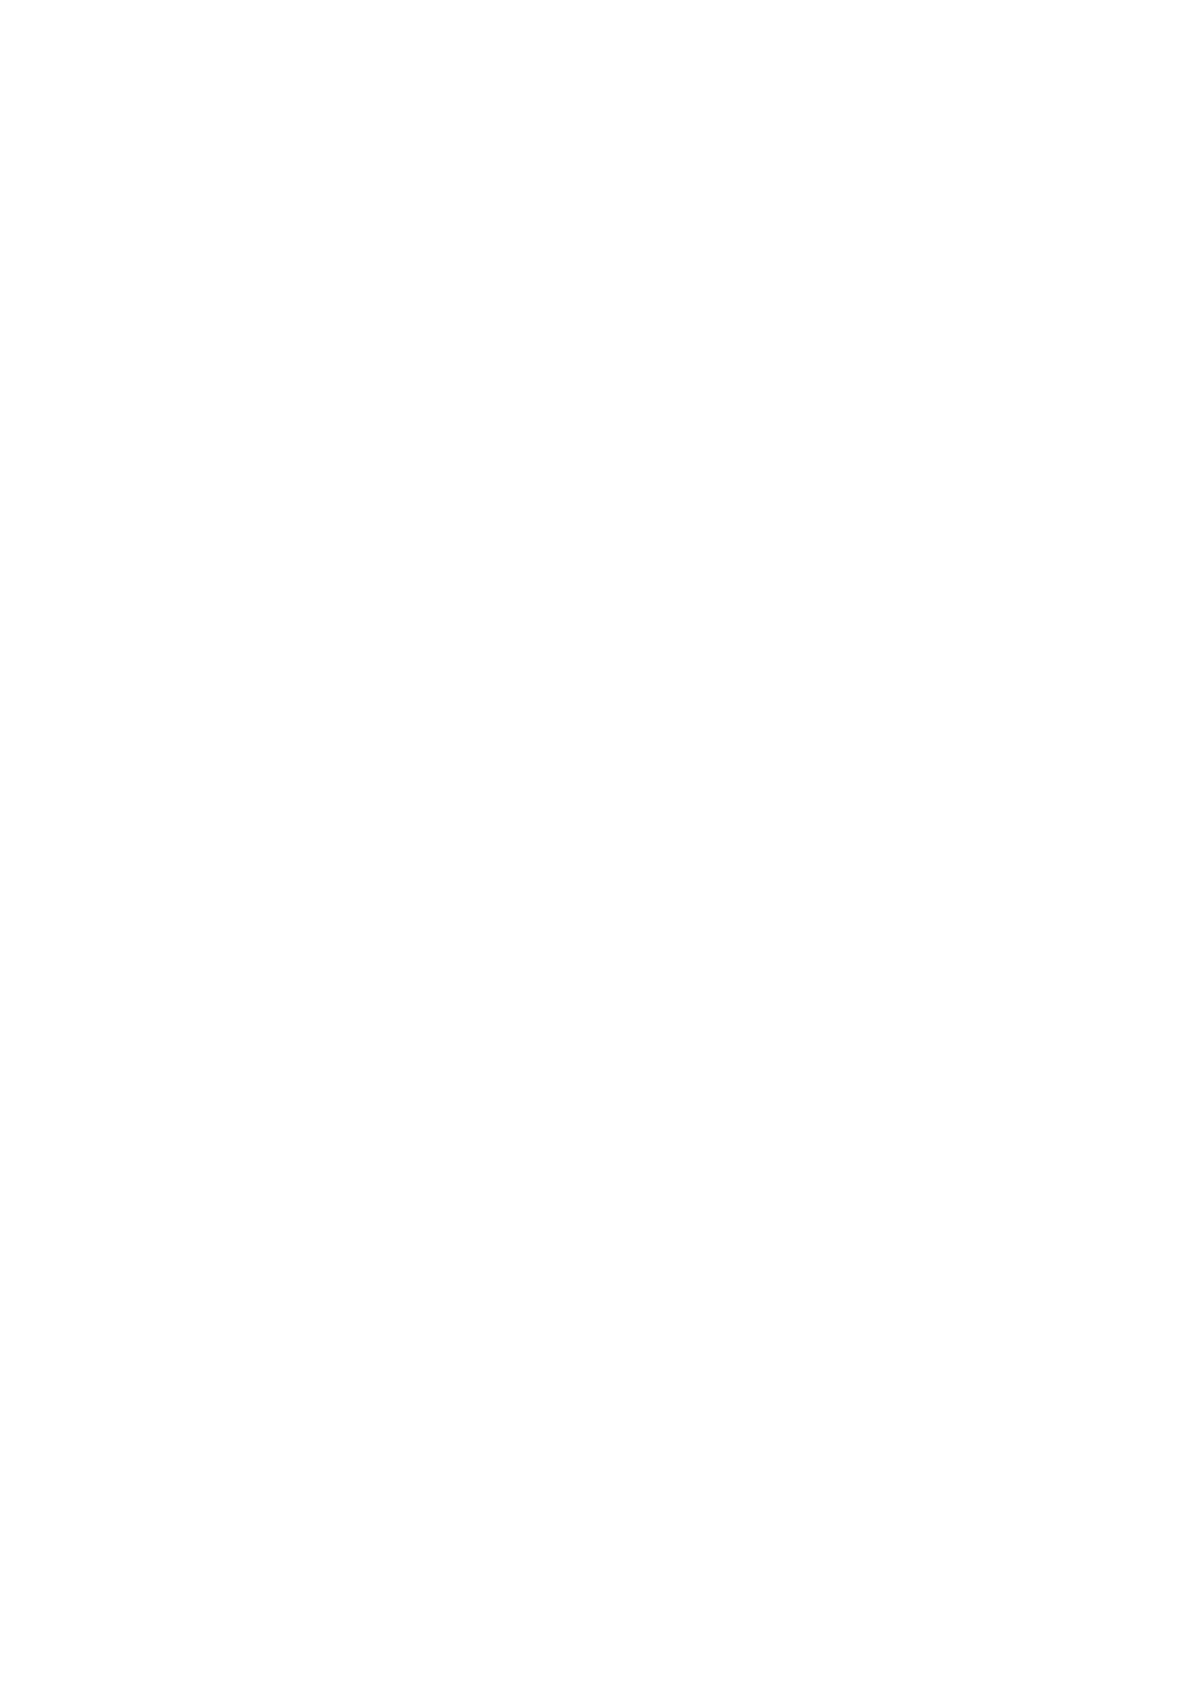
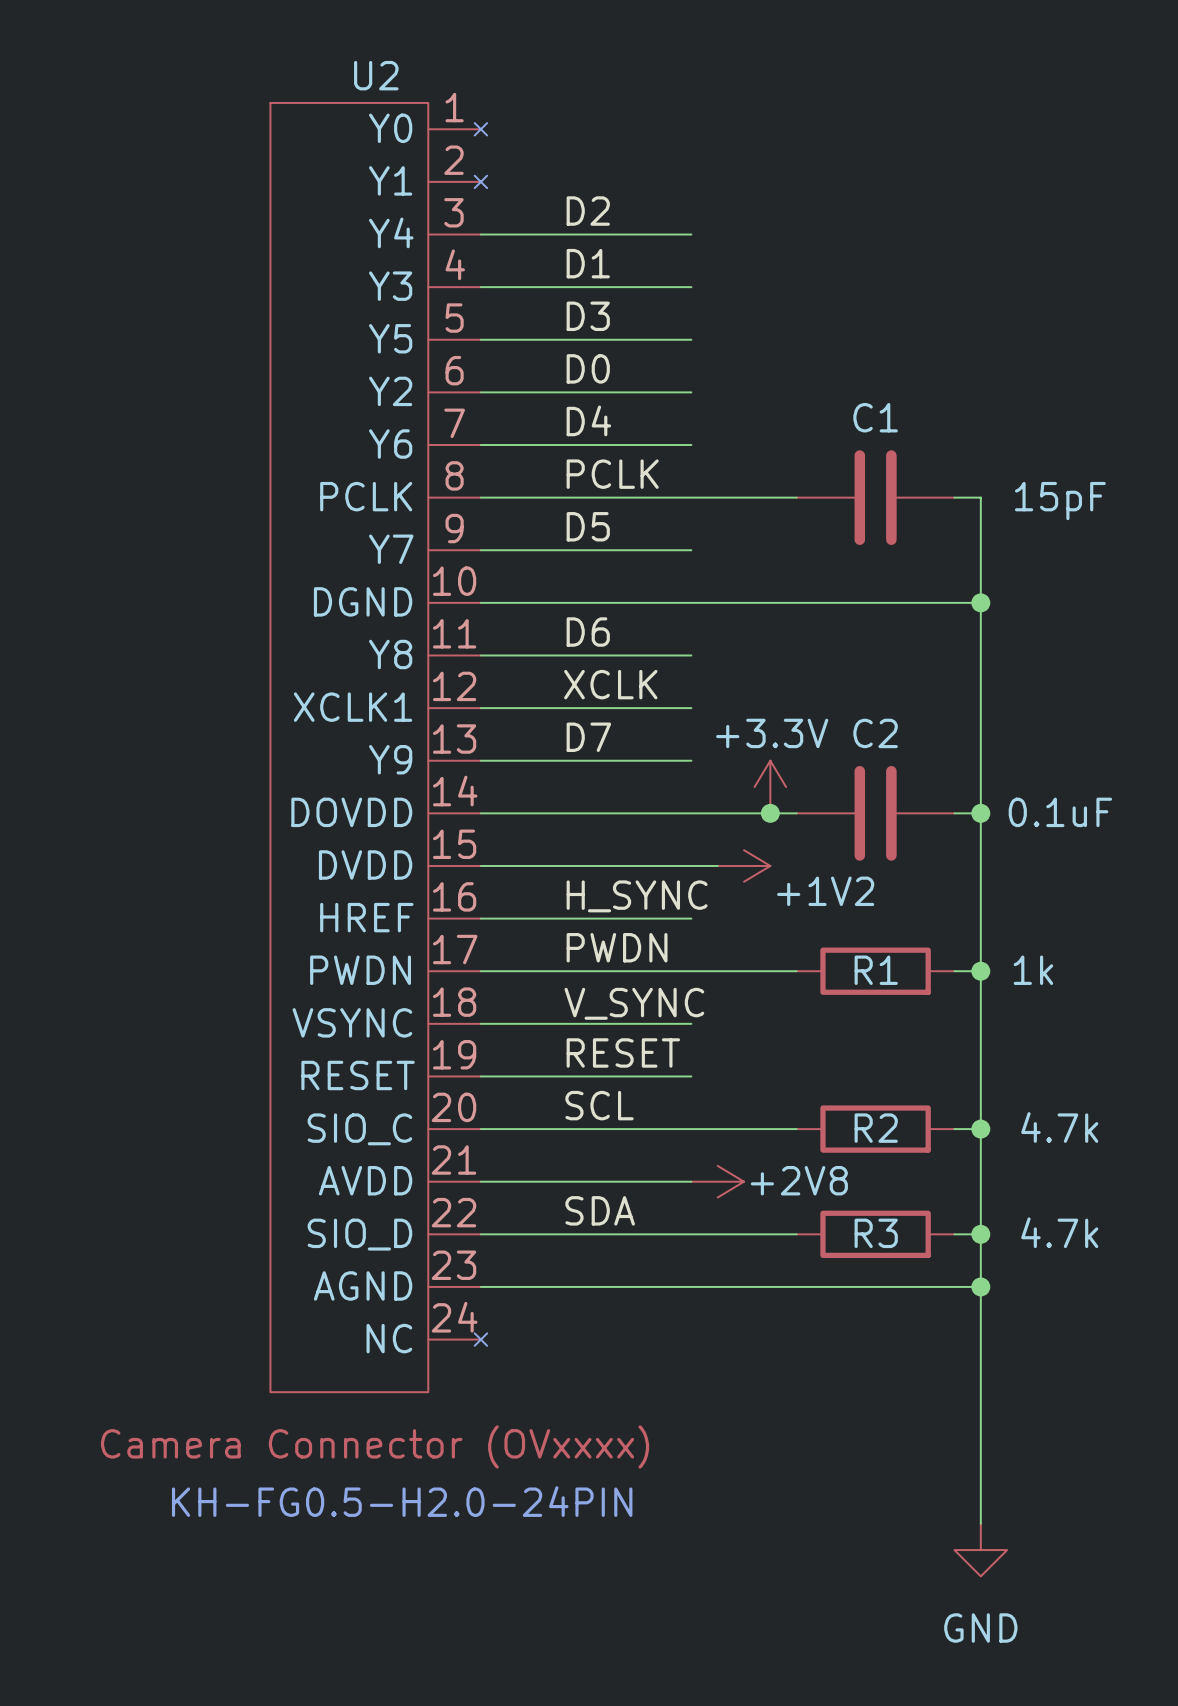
label: none -> D2 (588, 211)
wire: none -> (480, 234) (691, 234)
label: none -> D1 (588, 263)
wire: none -> (480, 287) (691, 287)
label: none -> D3 (588, 316)
wire: none -> (480, 339) (691, 339)
label: none -> D0 (588, 368)
wire: none -> (480, 392) (691, 392)
label: none -> D4 (588, 420)
wire: none -> (480, 445) (691, 445)
label: none -> PCLK (612, 474)
wire: none -> (480, 497) (796, 497)
C1: none -> 15pF (875, 497)
wire: none -> (954, 497) (980, 497) (980, 1523)
label: none -> D5 (588, 526)
wire: none -> (480, 550) (691, 550)
wire: none -> (480, 602) (980, 602)
junction: none -> (980, 602)
label: none -> D6 (588, 632)
wire: none -> (480, 655) (691, 655)
label: none -> XCLK (610, 684)
wire: none -> (480, 708) (691, 708)
label: none -> D7 (588, 737)
U2: none -> (378, 747)
wire: none -> (480, 760) (691, 760)
power symbol: none -> +3.3V (770, 787)
wire: none -> (480, 813) (796, 813)
junction: none -> (770, 813)
C2: none -> 0.1uF (875, 813)
wire: none -> (954, 813) (980, 813)
junction: none -> (980, 813)
wire: none -> (480, 865) (717, 865)
power symbol: none -> +1V2 (744, 865)
label: none -> H_SYNC (637, 896)
wire: none -> (480, 918) (691, 918)
label: none -> PWDN (617, 947)
wire: none -> (480, 971) (796, 971)
R1: none -> 1k (875, 971)
wire: none -> (954, 971) (980, 971)
junction: none -> (980, 971)
label: none -> V_SYNC (634, 1003)
wire: none -> (480, 1023) (691, 1023)
label: none -> RESET (623, 1052)
wire: none -> (480, 1076) (691, 1076)
label: none -> SCL (599, 1105)
wire: none -> (480, 1129) (796, 1129)
R2: none -> 4.7k (875, 1129)
wire: none -> (954, 1129) (980, 1129)
junction: none -> (980, 1129)
wire: none -> (480, 1181) (691, 1181)
power symbol: none -> +2V8 (717, 1181)
label: none -> SDA (600, 1210)
wire: none -> (480, 1234) (796, 1234)
R3: none -> 4.7k (875, 1234)
wire: none -> (954, 1234) (980, 1234)
junction: none -> (980, 1234)
wire: none -> (480, 1286) (980, 1286)
junction: none -> (980, 1286)
text: none -> KH-FG0.5-H2.0-24PIN (402, 1501)
power symbol: none -> GND (980, 1550)

